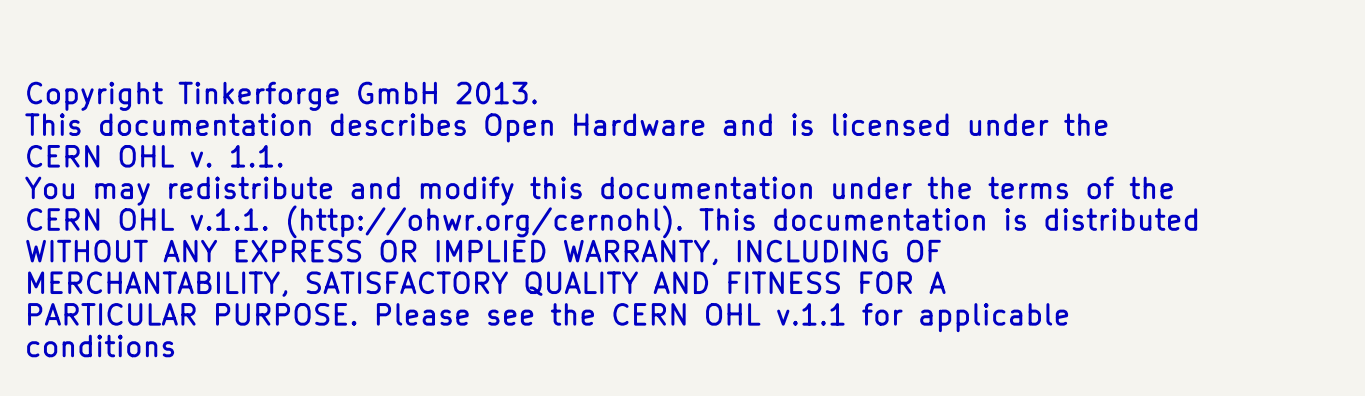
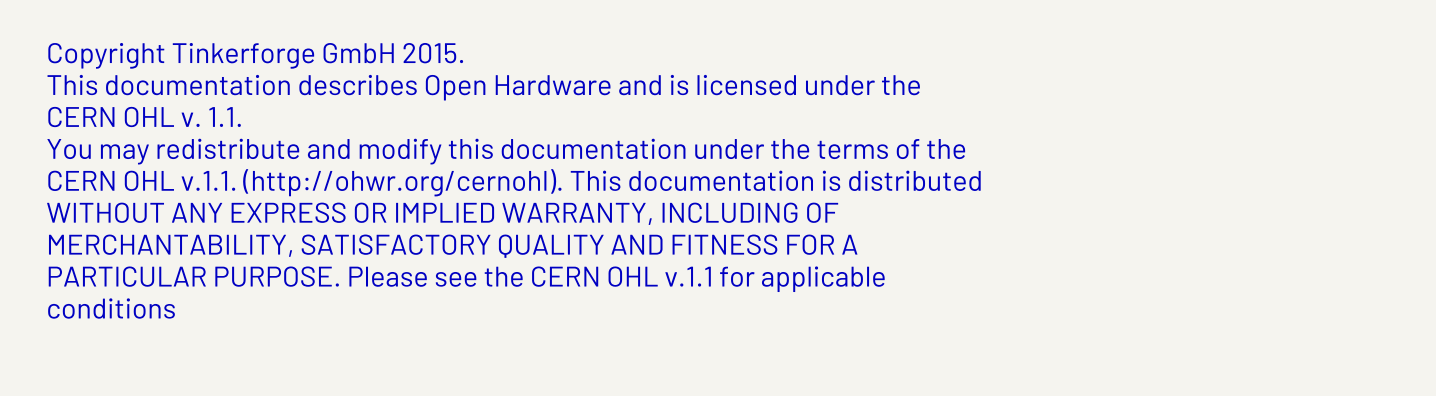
text: Copyright Tinkerforge GmbH 2013. (282, 96) -> Copyright Tinkerforge GmbH 2015. (255, 55)

